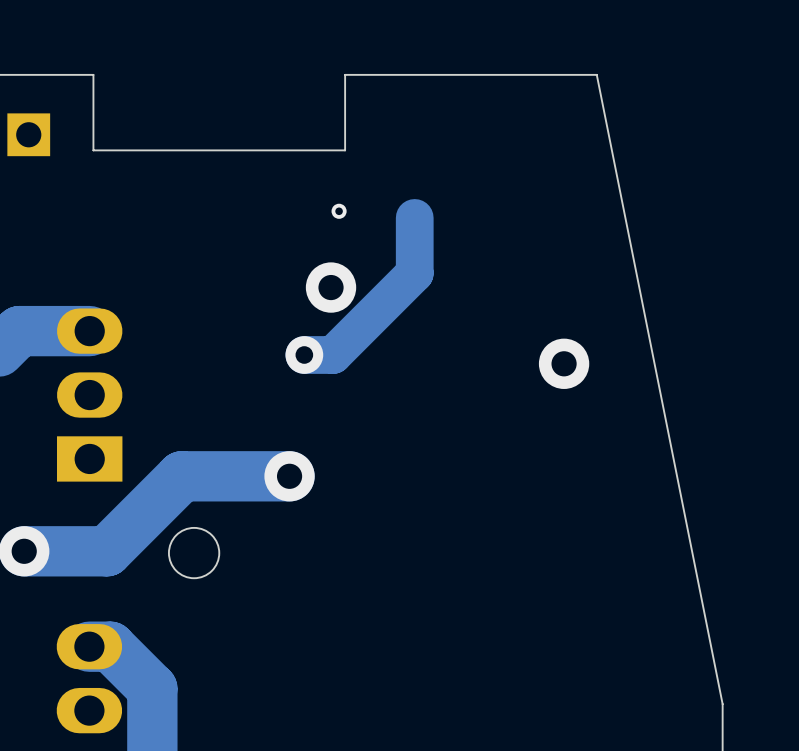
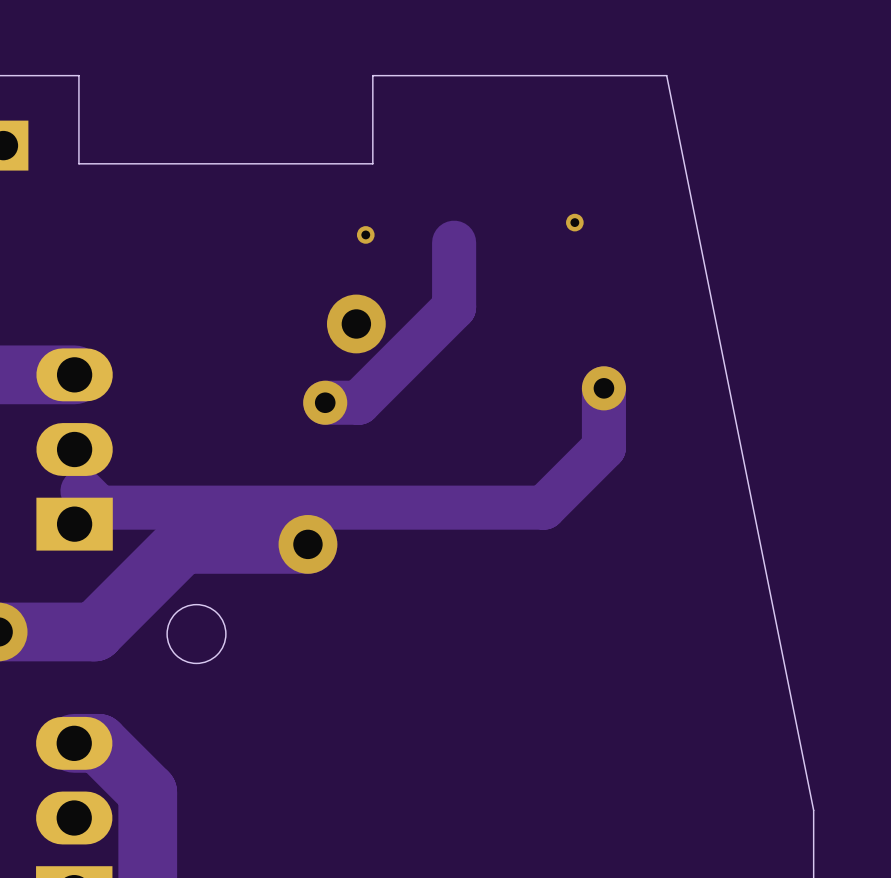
via: none -> (574, 222)
track: none -> (603, 388) (603, 447) (543, 507) (99, 507) (82, 491)
via: none -> (603, 388)
via: (564, 363) -> none

